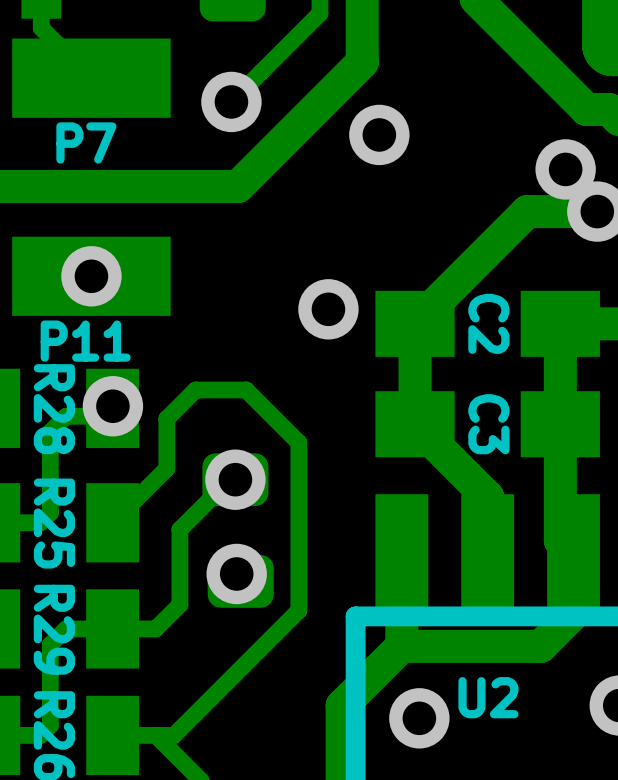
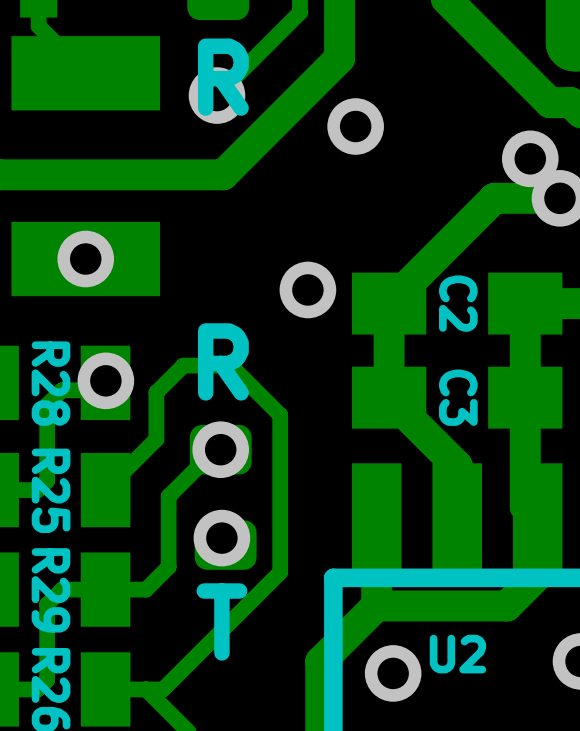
text: none -> R (223, 77)
P7 name: P7 (86, 142) -> none
P11 name: P11 (85, 341) -> none
text: none -> R (223, 361)
text: none -> T (221, 621)

